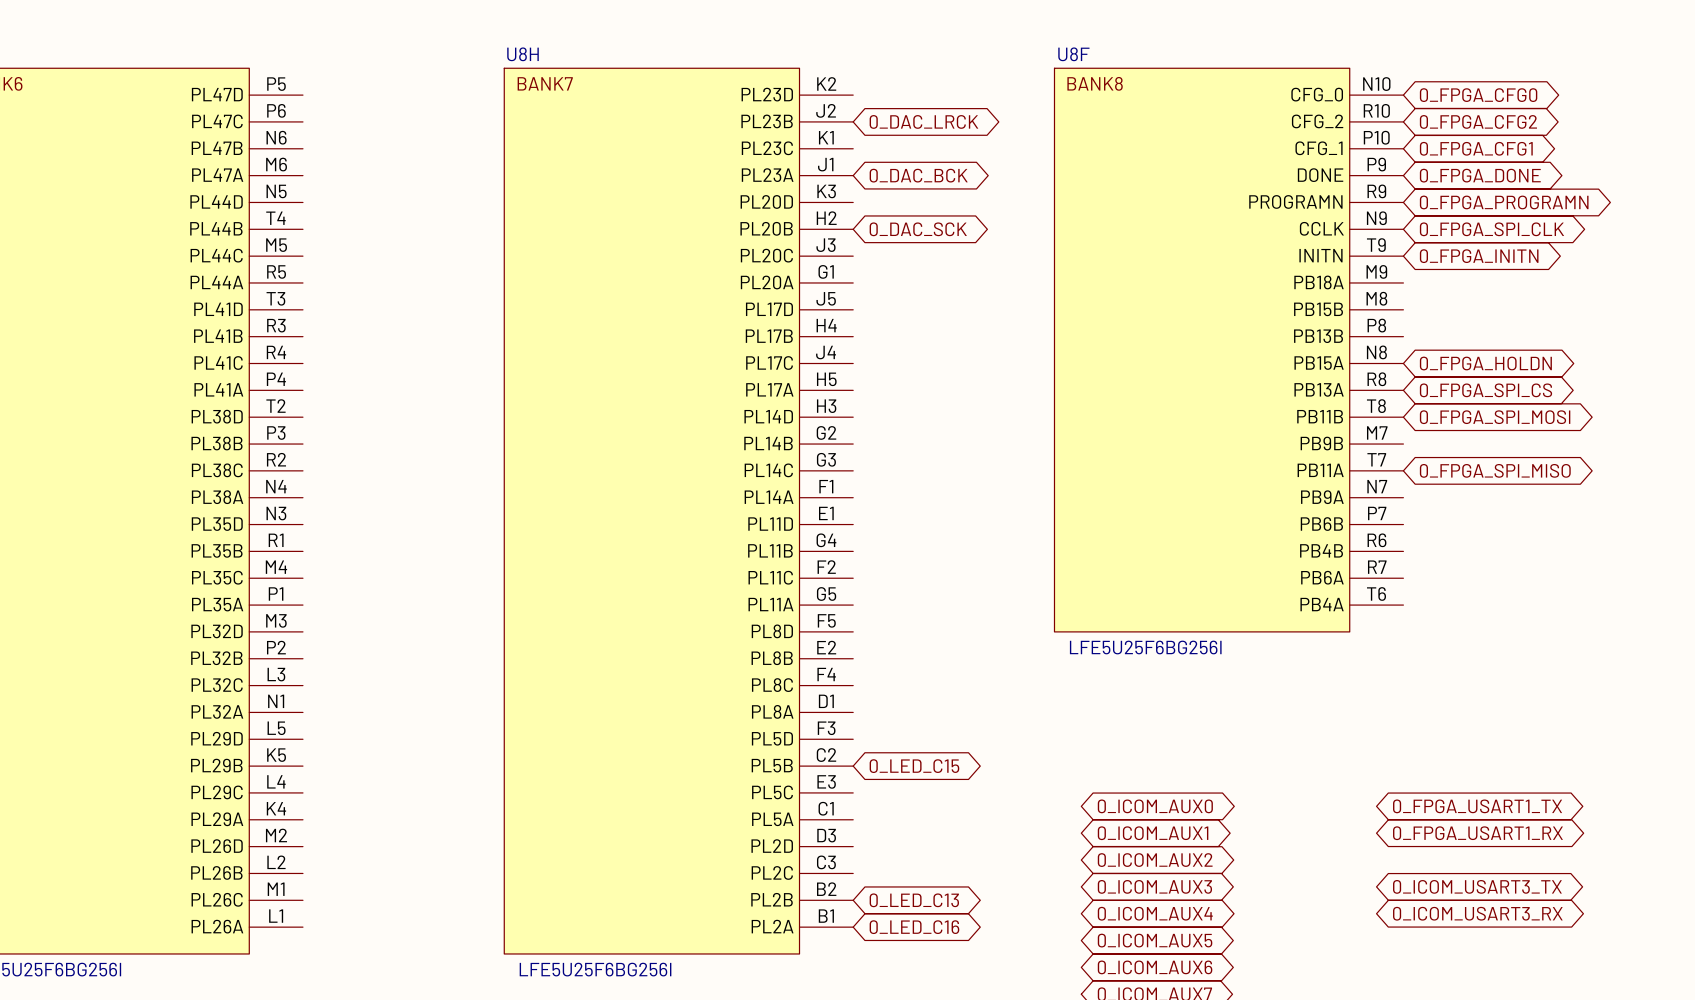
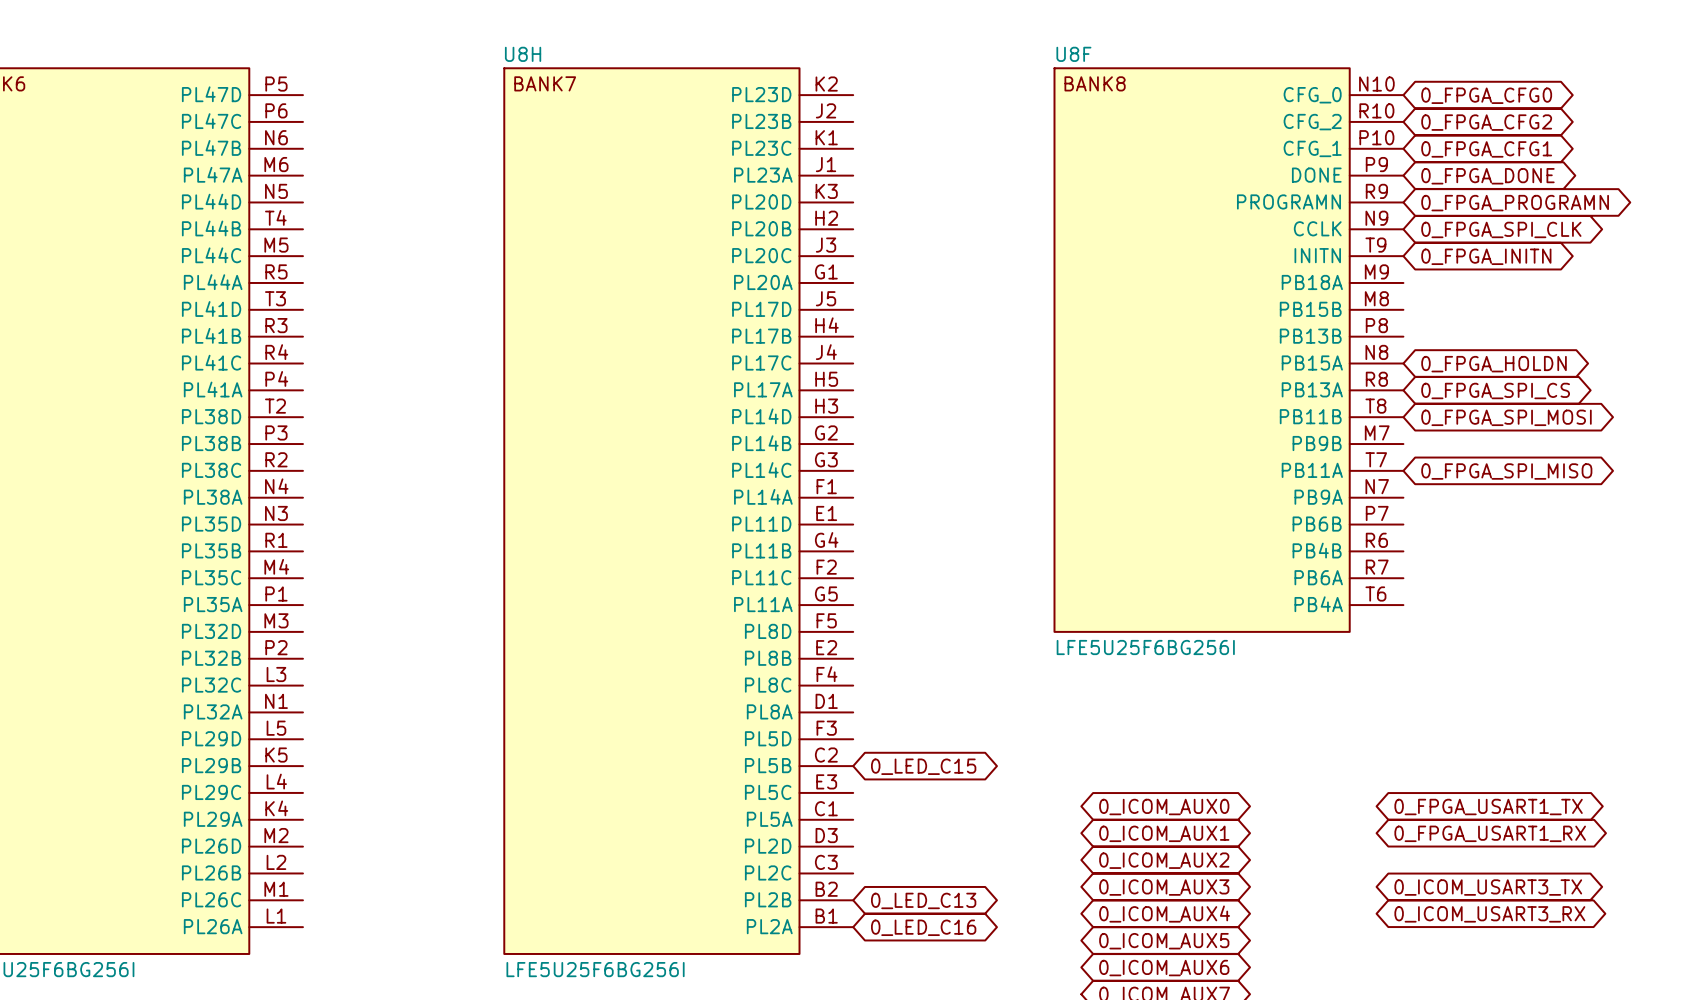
global label: 0_DAC_LRCK (923, 121) -> none
global label: 0_DAC_BCK (918, 175) -> none
global label: 0_DAC_SCK (918, 229) -> none

